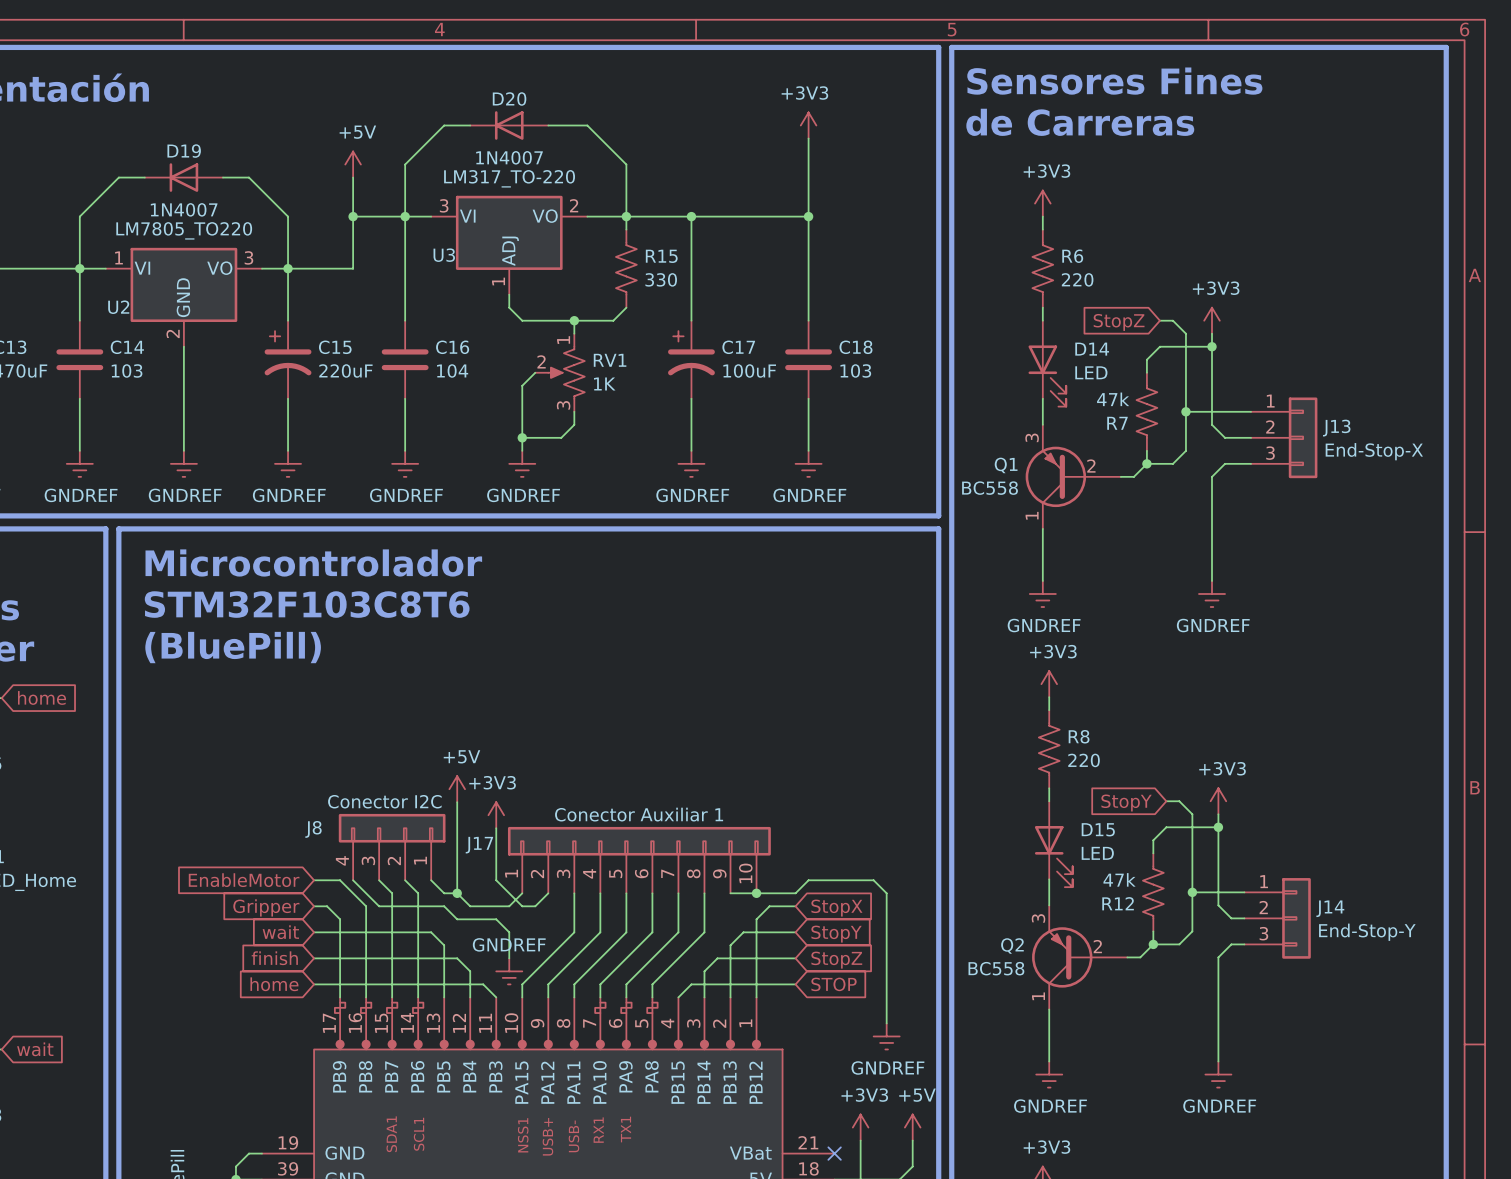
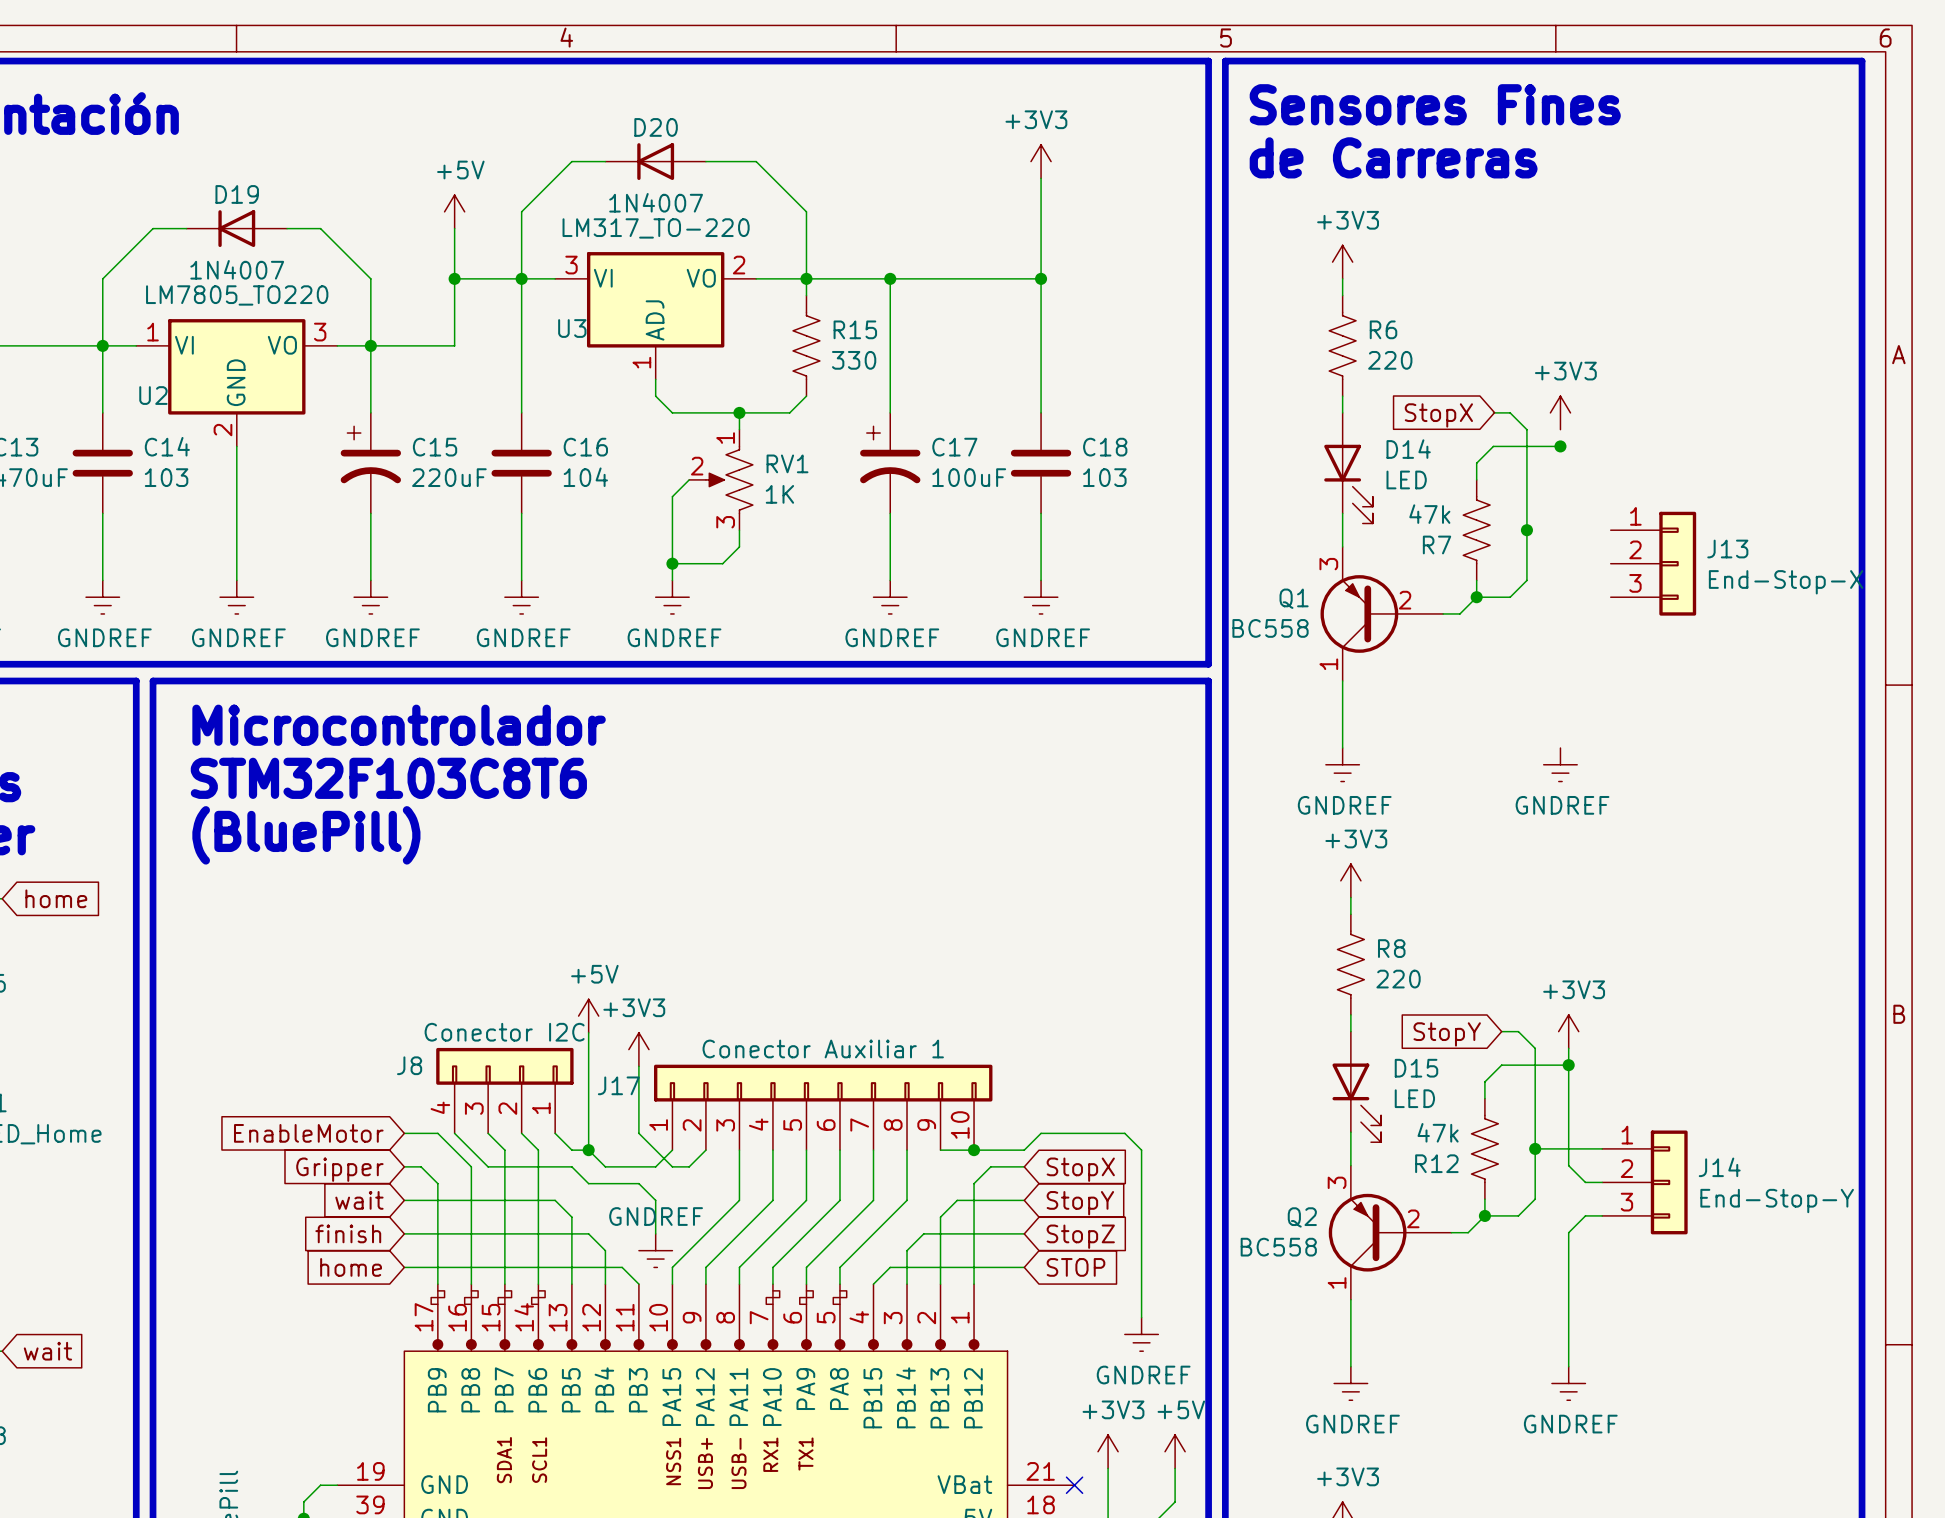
global label: StopZ (1119, 322) -> StopX (1438, 415)
wire: (1212, 333) (1212, 424) (1225, 437) (1251, 437) -> none
wire: (1185, 411) (1251, 411) -> none
wire: (1251, 463) (1225, 463) (1212, 476) (1212, 580) -> none

